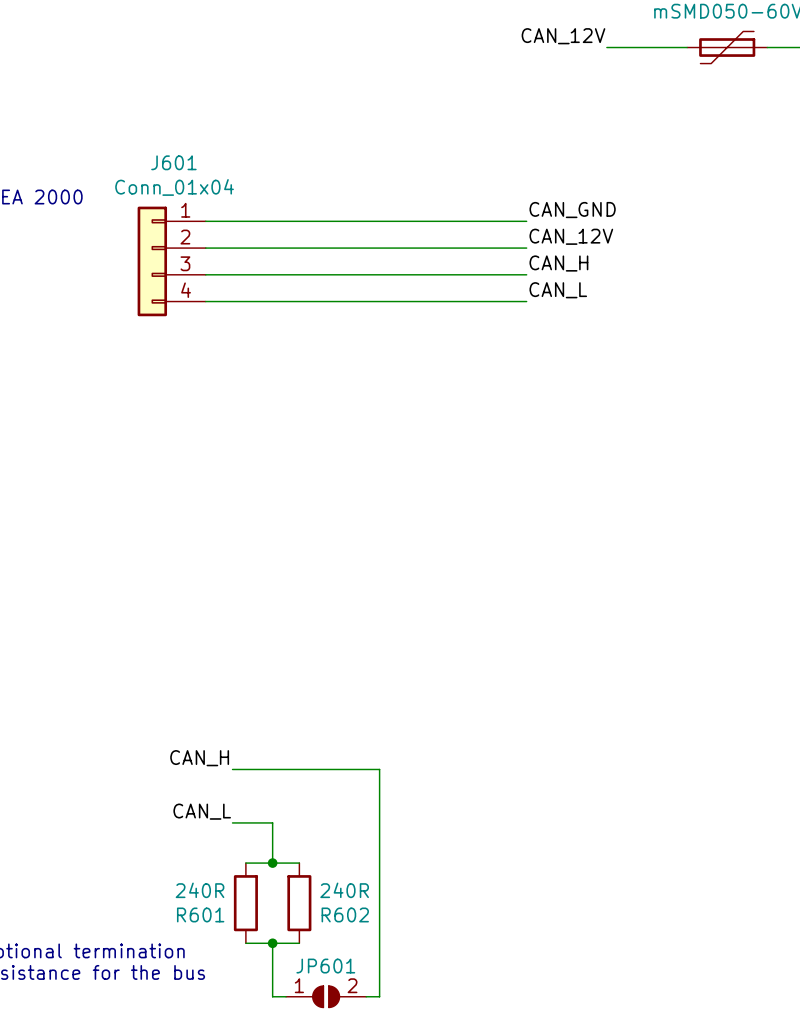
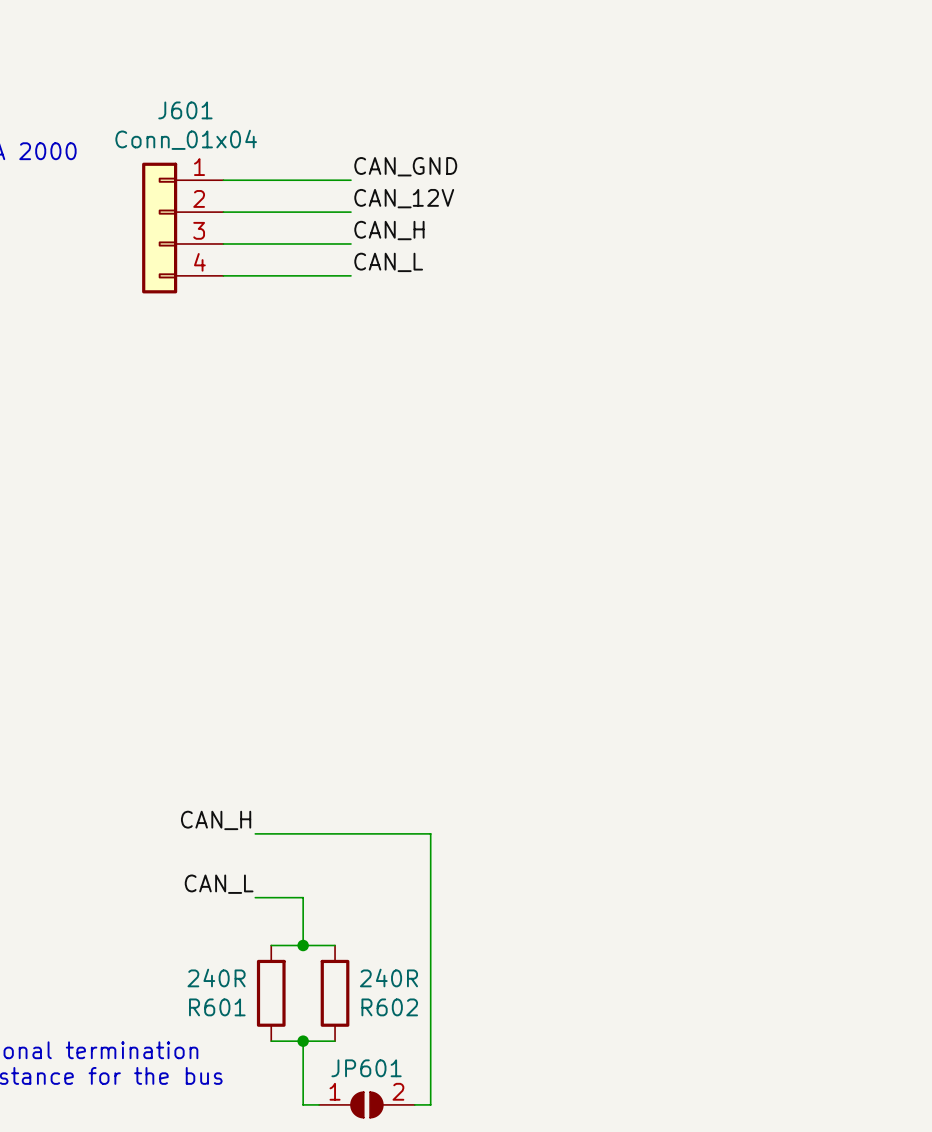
label position: CAN_GND (572, 210) -> CAN_GND (405, 166)
wire: (312, 221) (526, 221) -> none
label position: CAN_12V (571, 236) -> CAN_12V (404, 198)
wire: (312, 248) (526, 248) -> none
label position: CAN_H (558, 263) -> CAN_H (389, 230)
wire: (312, 274) (526, 274) -> none
label position: CAN_L (558, 290) -> CAN_L (388, 262)
wire: (312, 301) (526, 301) -> none

